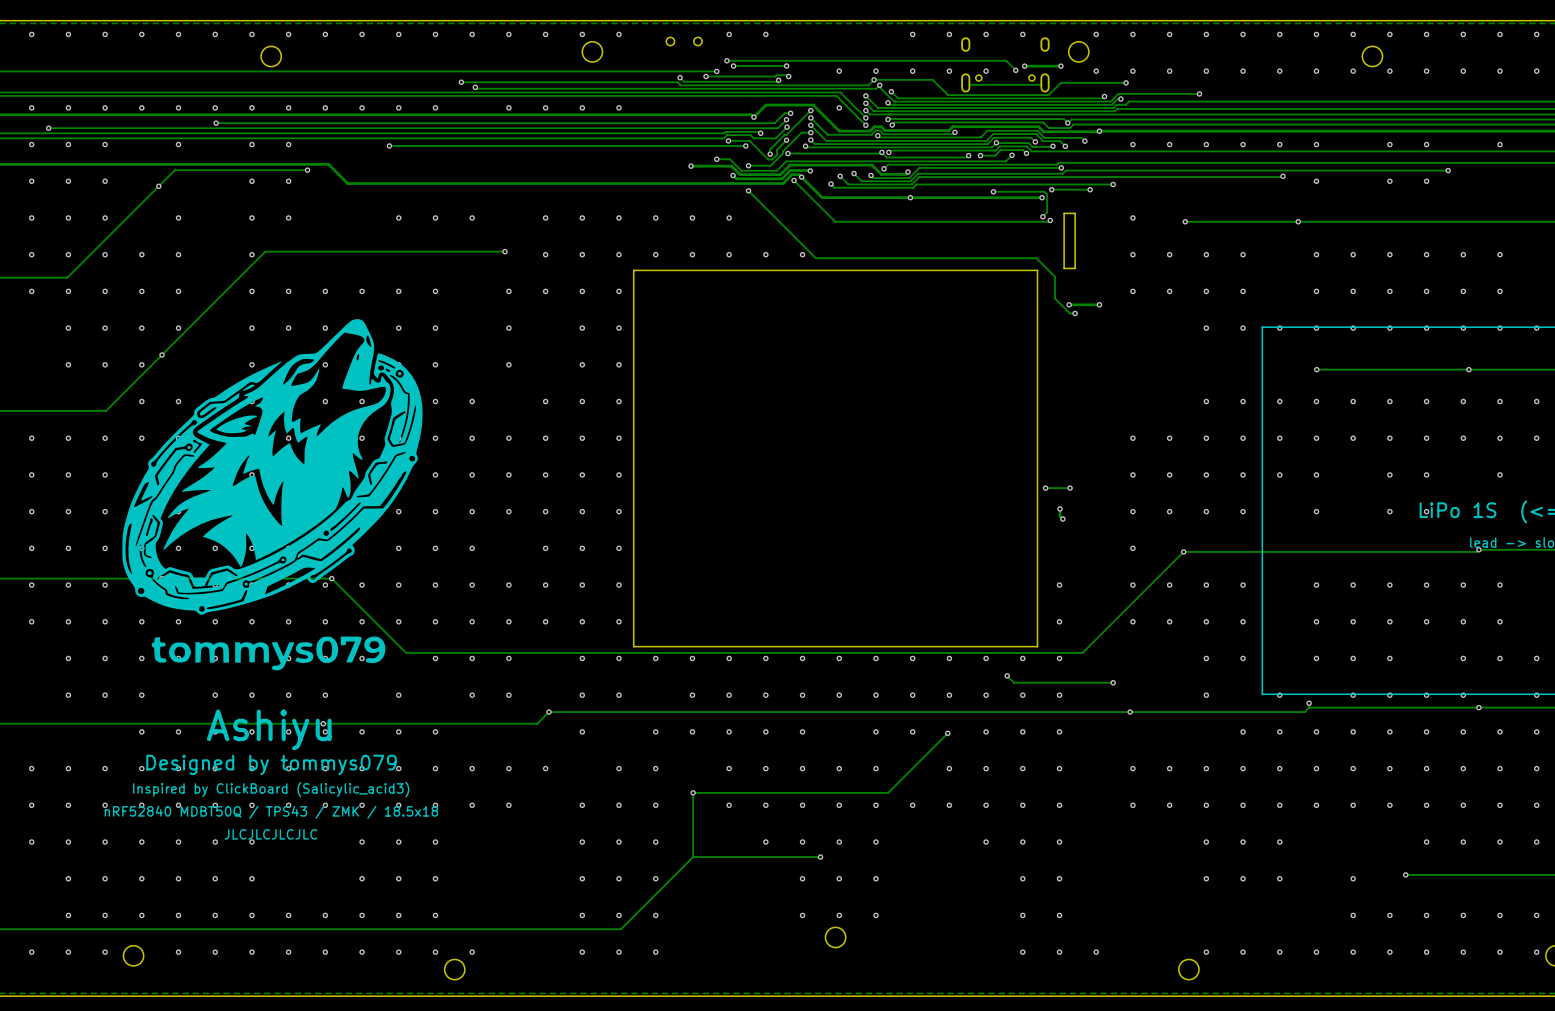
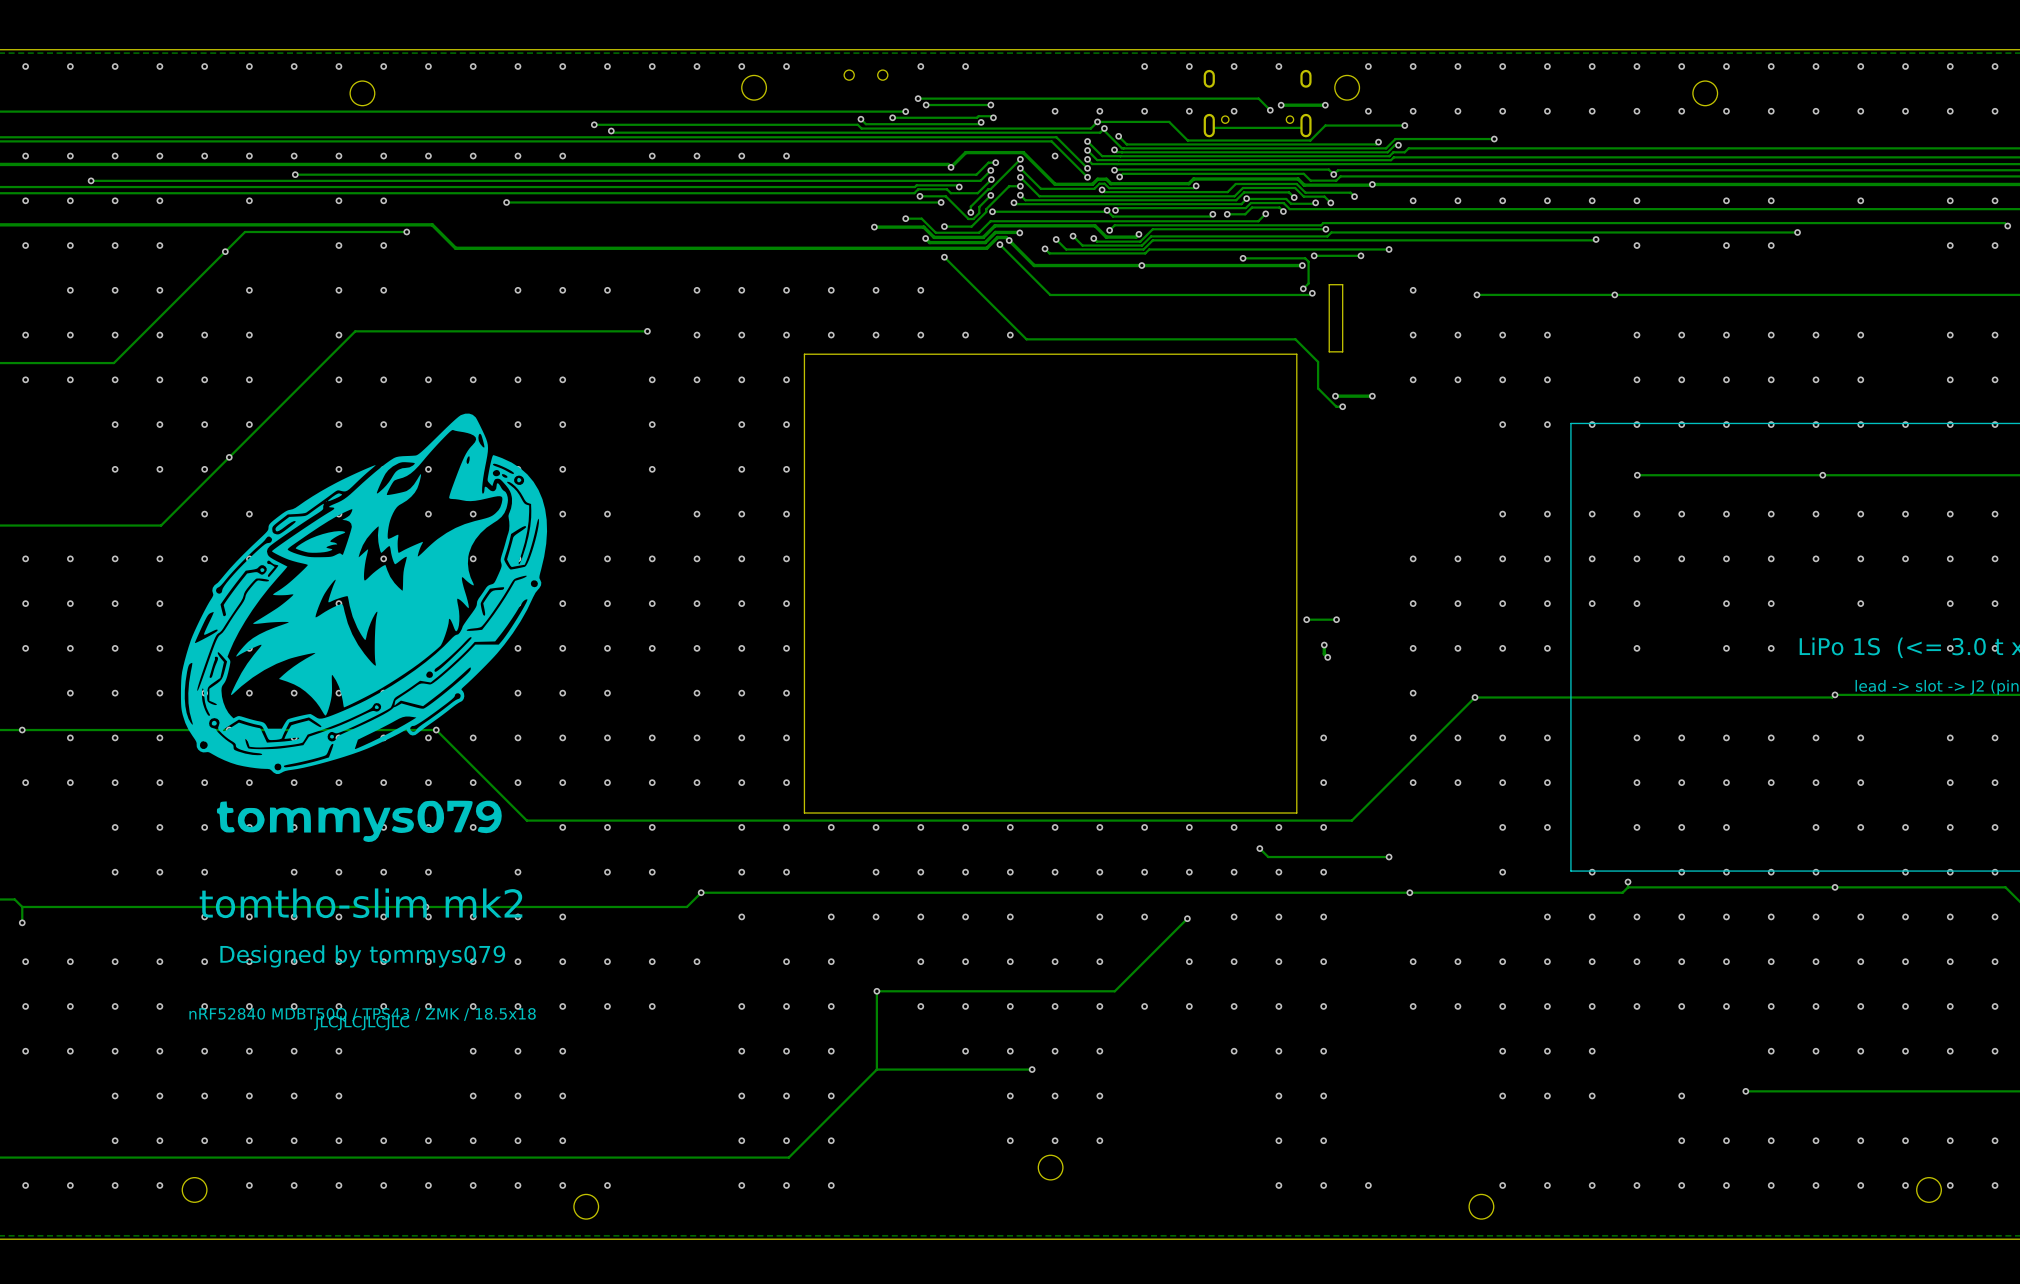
text: Ashiyu (269, 729) -> tomtho-slim mk2 (361, 903)
text: Inspired by ClickBoard (Salicylic_acid3) (271, 789) -> none
text position: JLCJLCJLCJLC (271, 834) -> JLCJLCJLCJLC (361, 1023)

